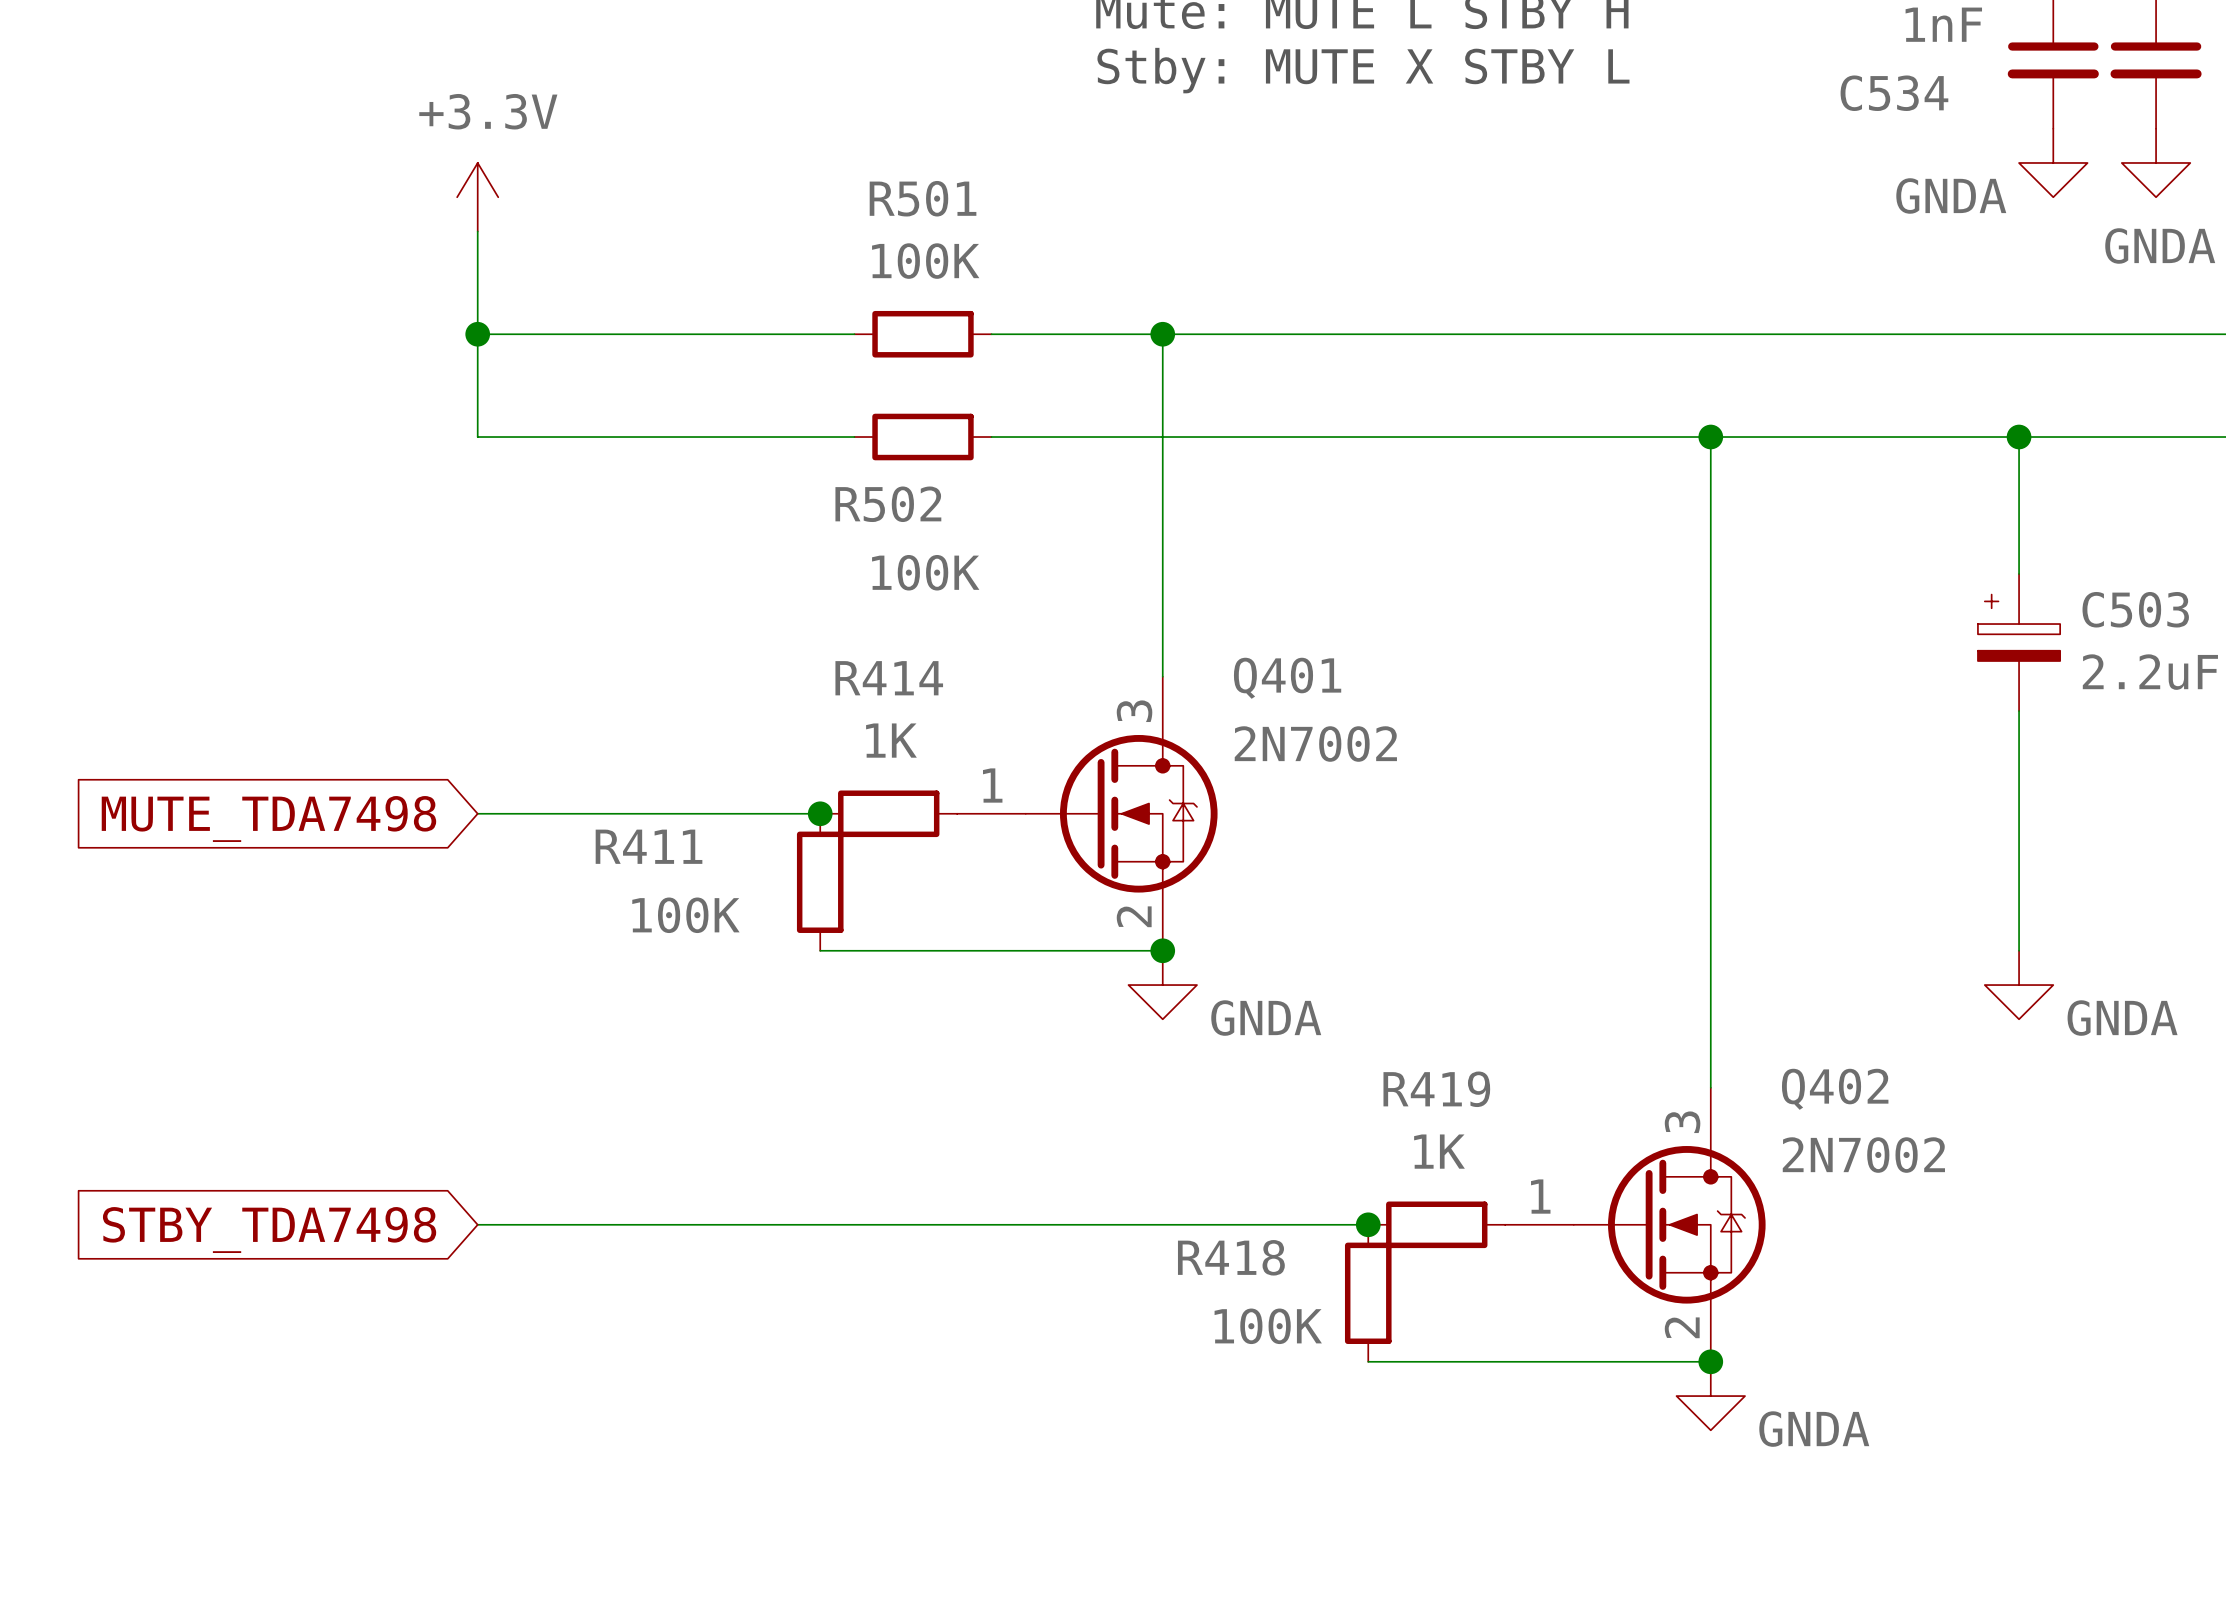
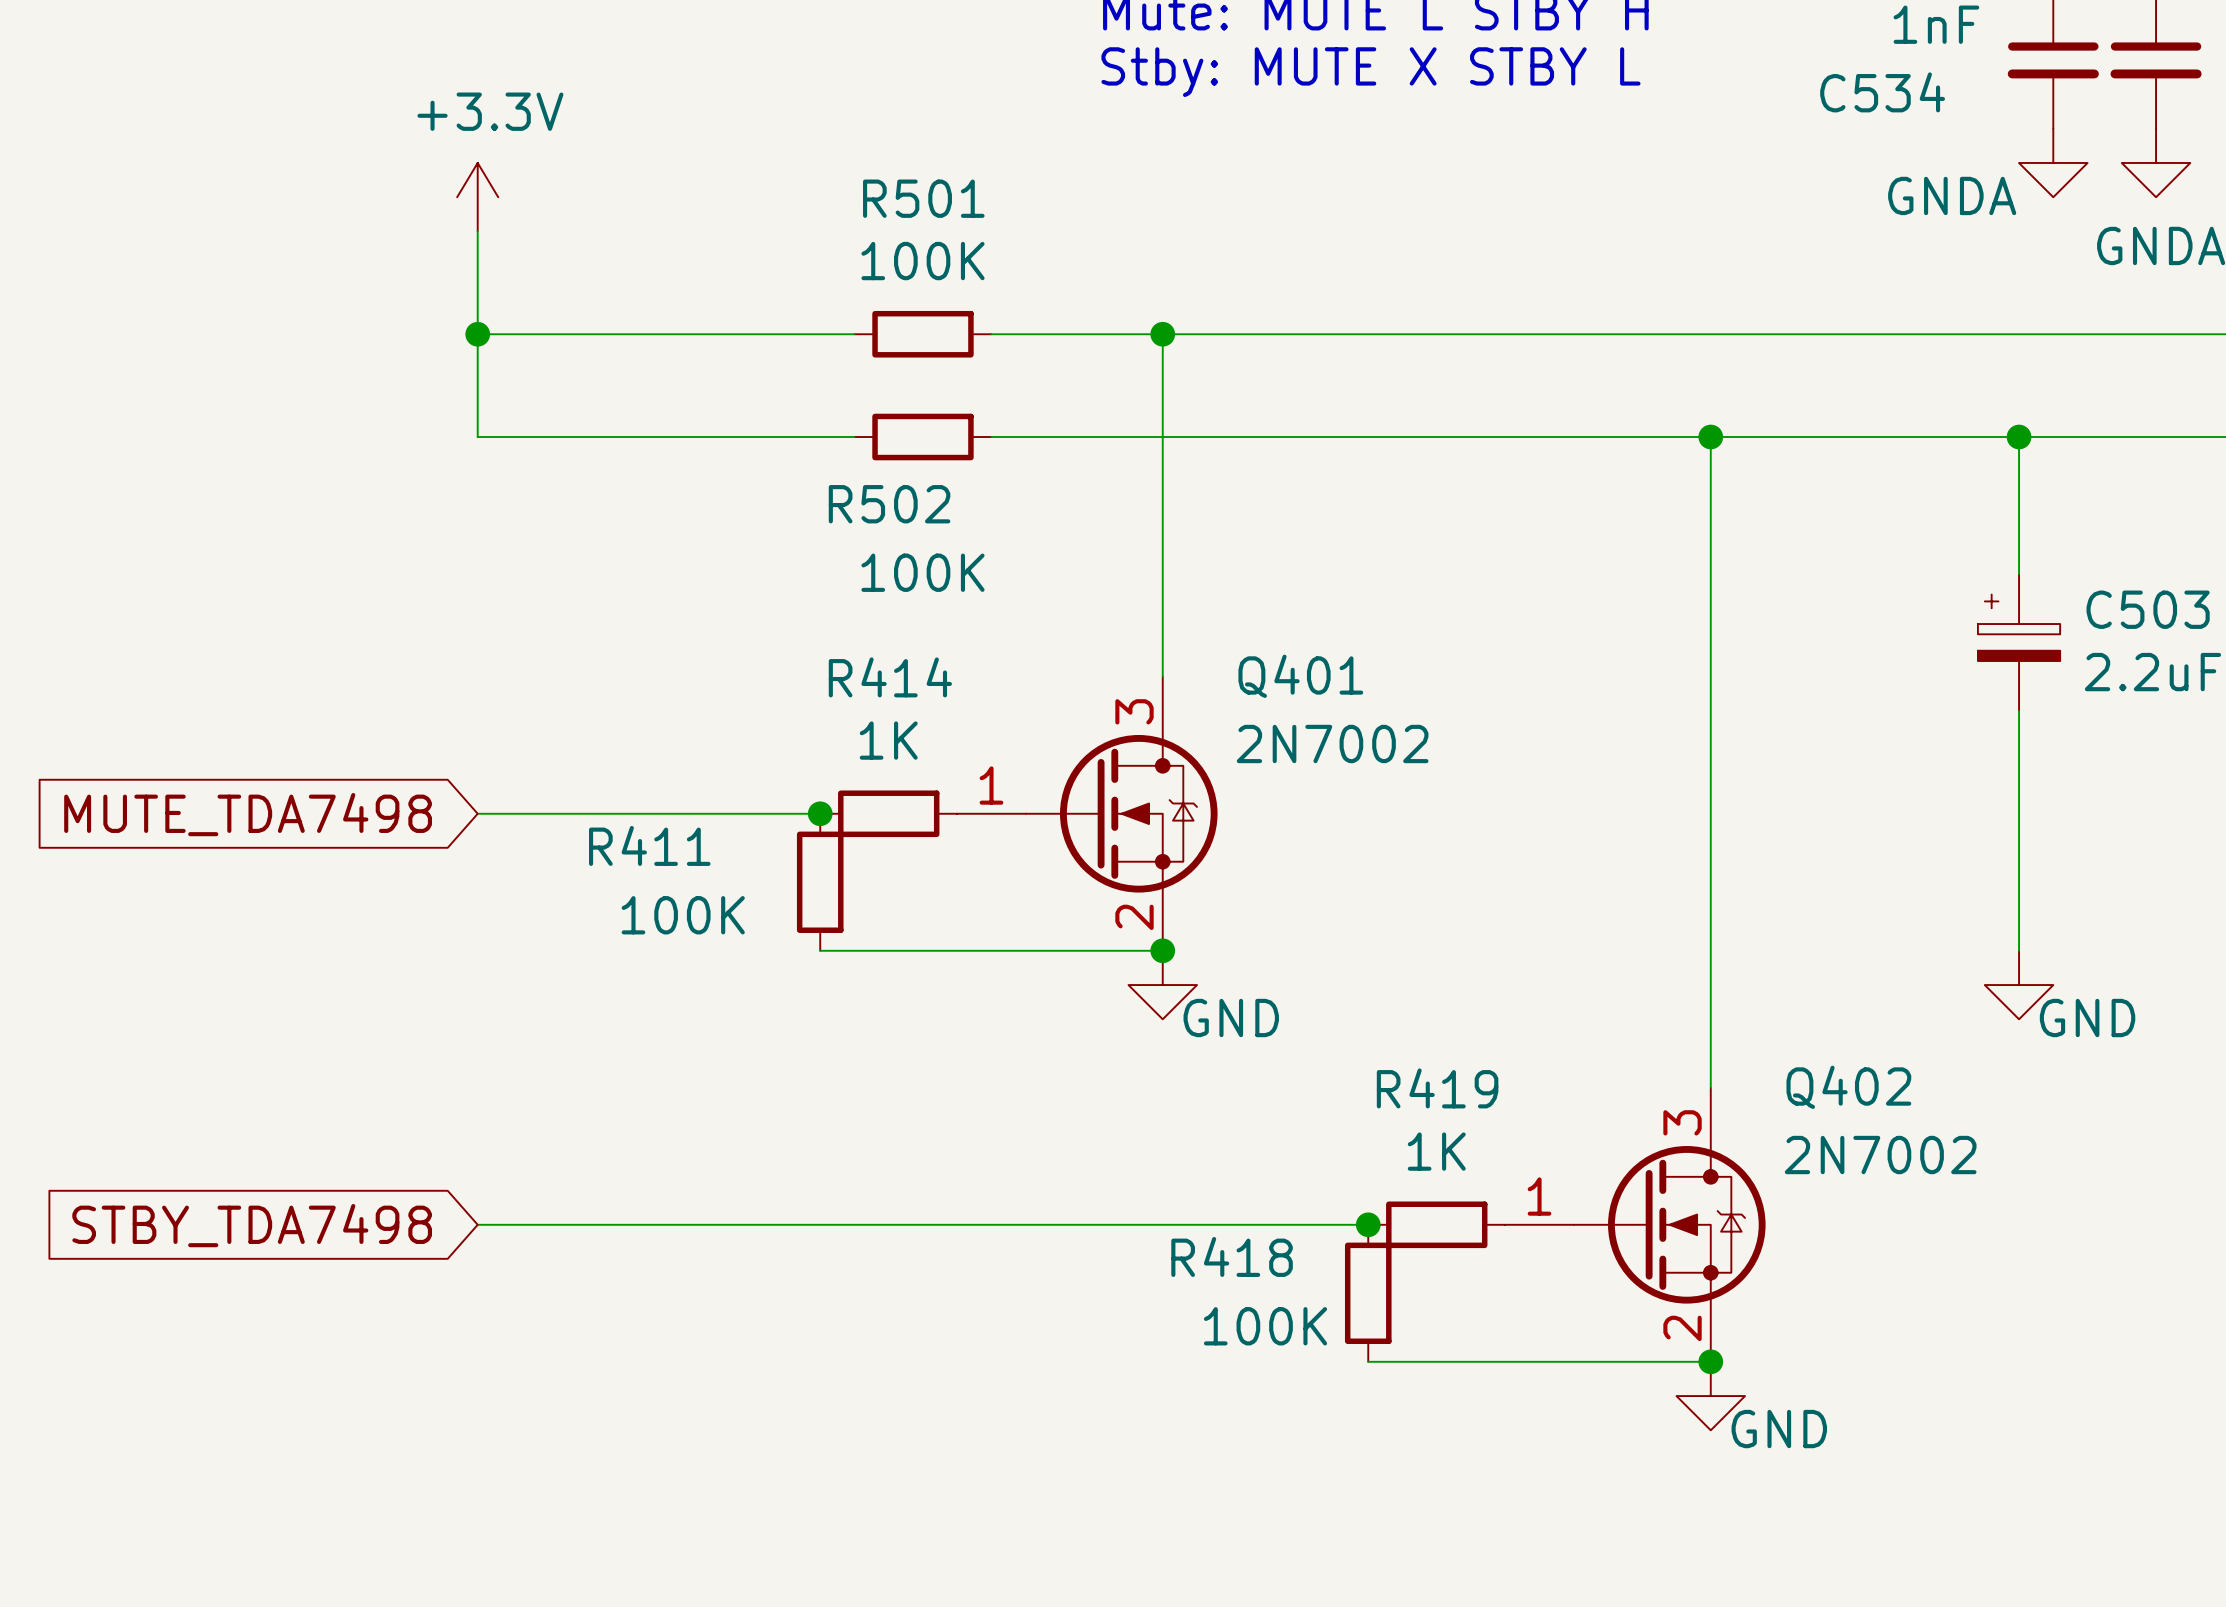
power symbol: GNDA (1162, 985) -> GND (1162, 985)
power symbol: GNDA (2019, 985) -> GND (2019, 985)
power symbol: GNDA (1710, 1396) -> GND (1710, 1396)

